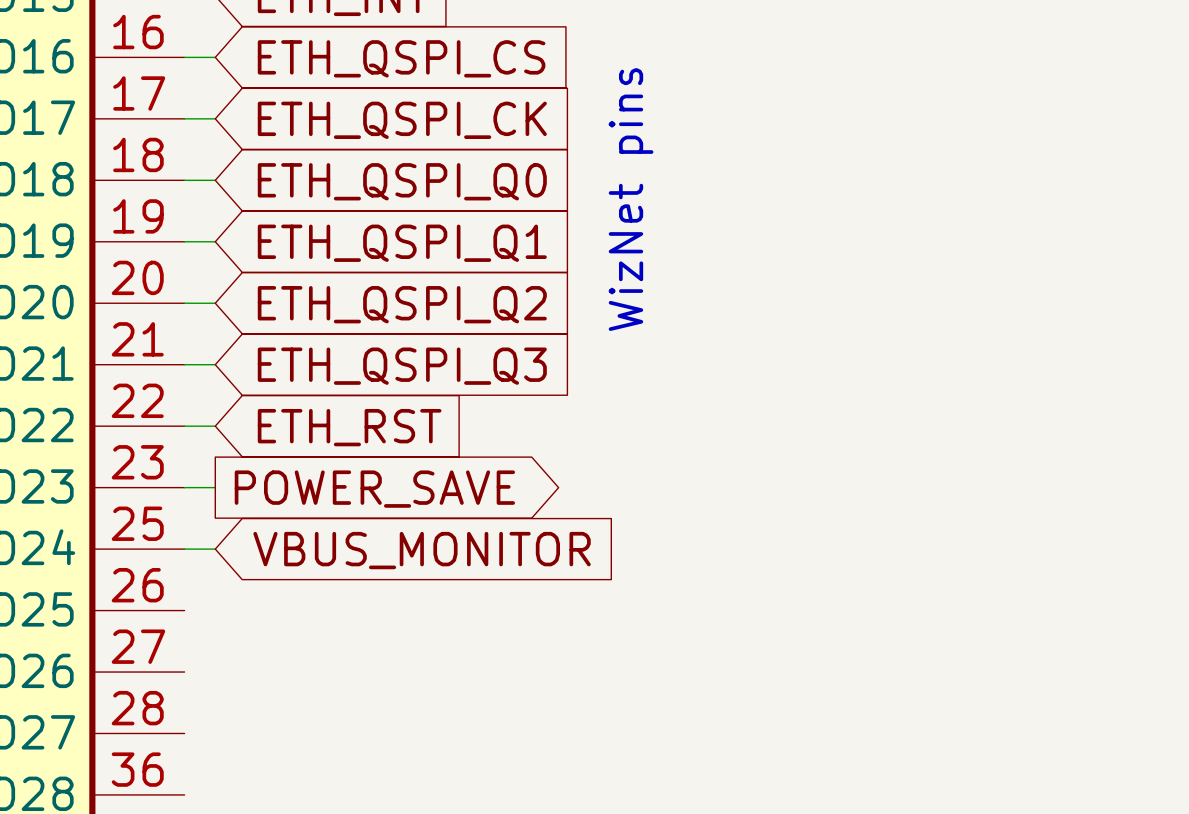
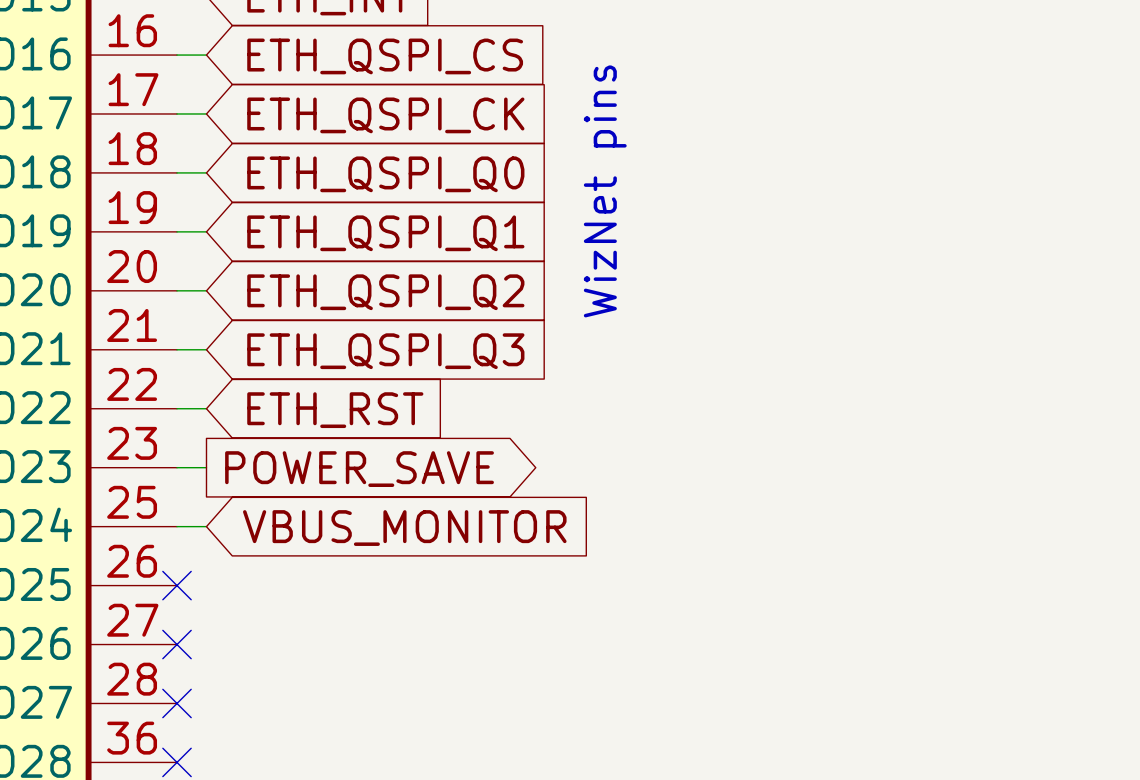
no-connect mark: none -> (177, 585)
no-connect mark: none -> (177, 644)
no-connect mark: none -> (177, 703)
no-connect mark: none -> (177, 762)

